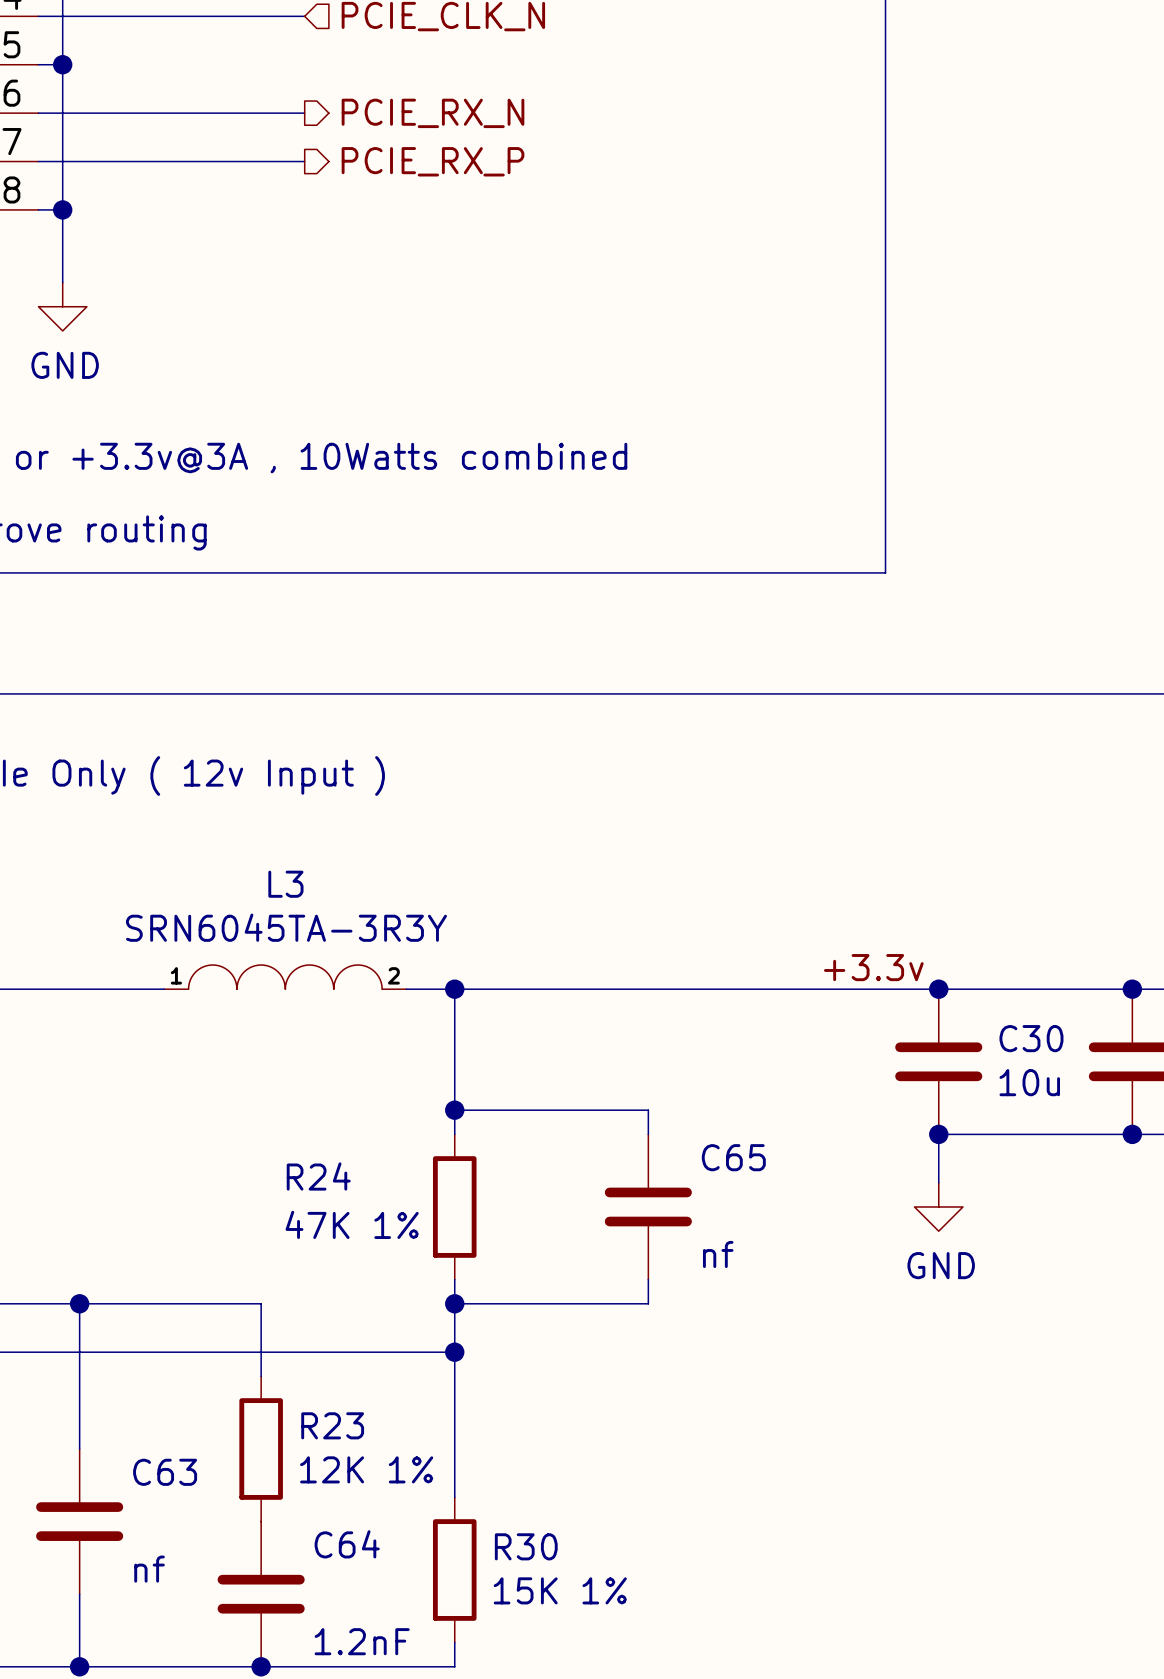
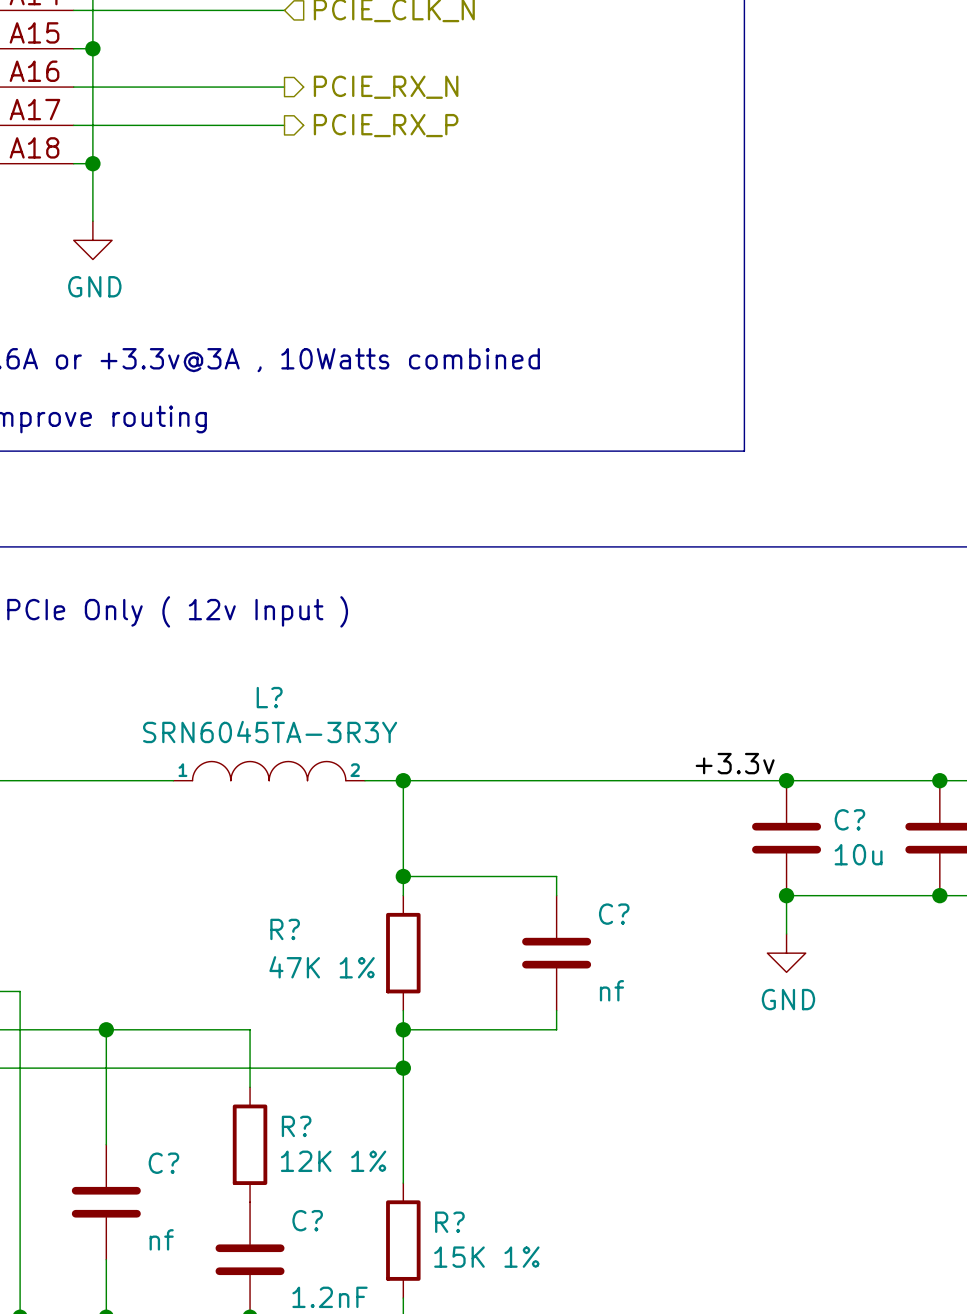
L3 name: L3 (285, 884) -> L? (269, 697)
C30 name: C30 (1031, 1038) -> C? (849, 819)
C65 name: C65 (733, 1157) -> C? (614, 914)
R24 name: R24 (318, 1176) -> R? (285, 929)
R23 name: R23 (332, 1425) -> R? (296, 1126)
C63 name: C63 (165, 1472) -> C? (163, 1163)
C64 name: C64 (347, 1544) -> C? (307, 1220)
R30 name: R30 (526, 1546) -> R? (449, 1222)

